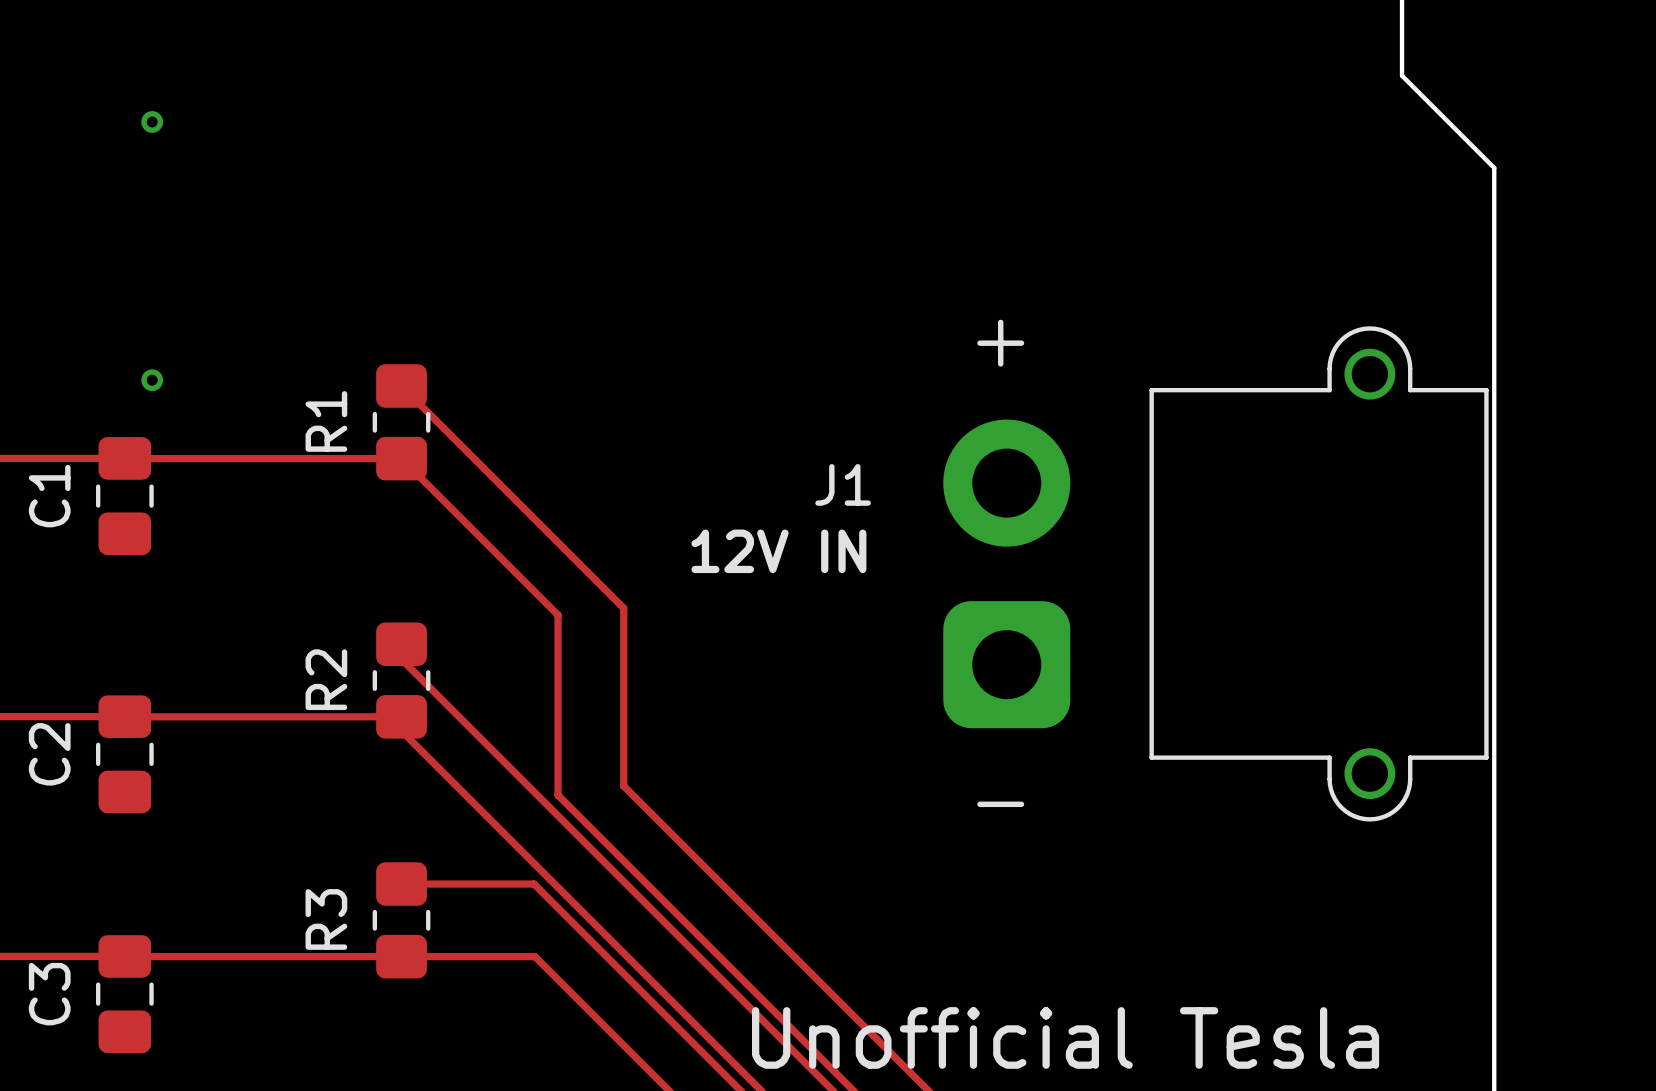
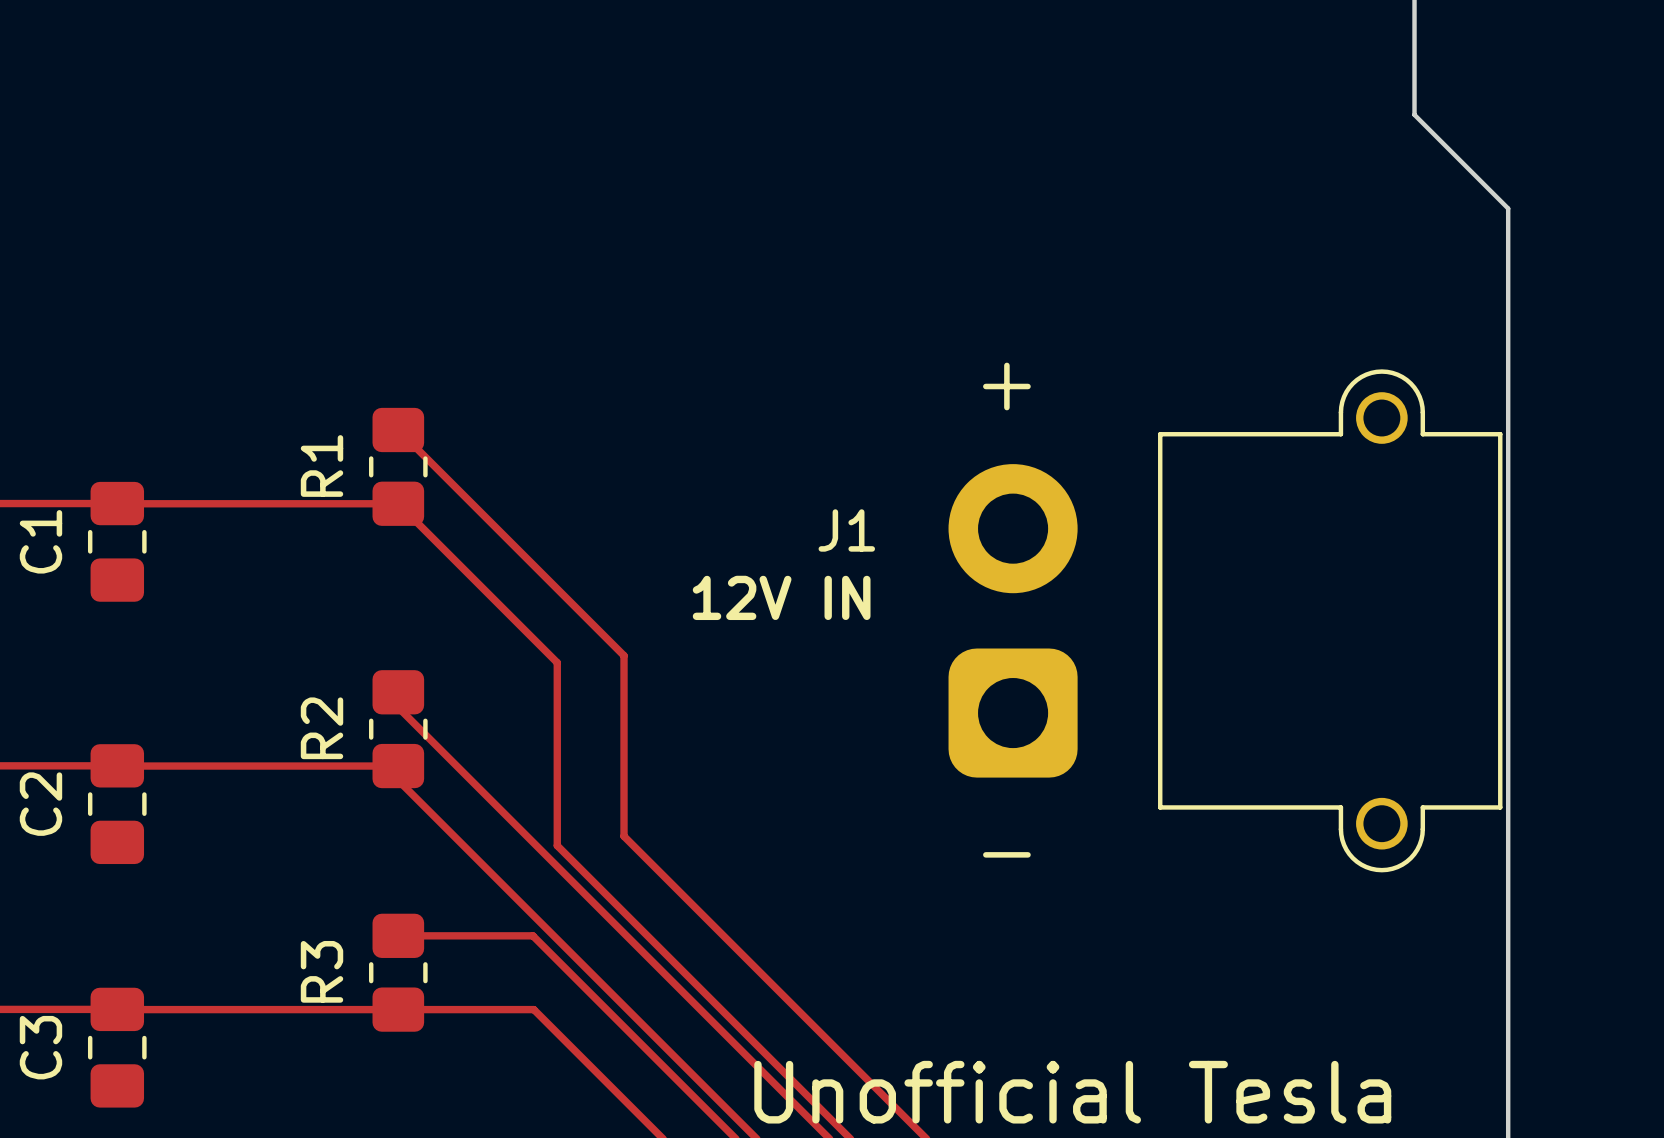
via: (152, 121) -> none
via: (152, 380) -> none

